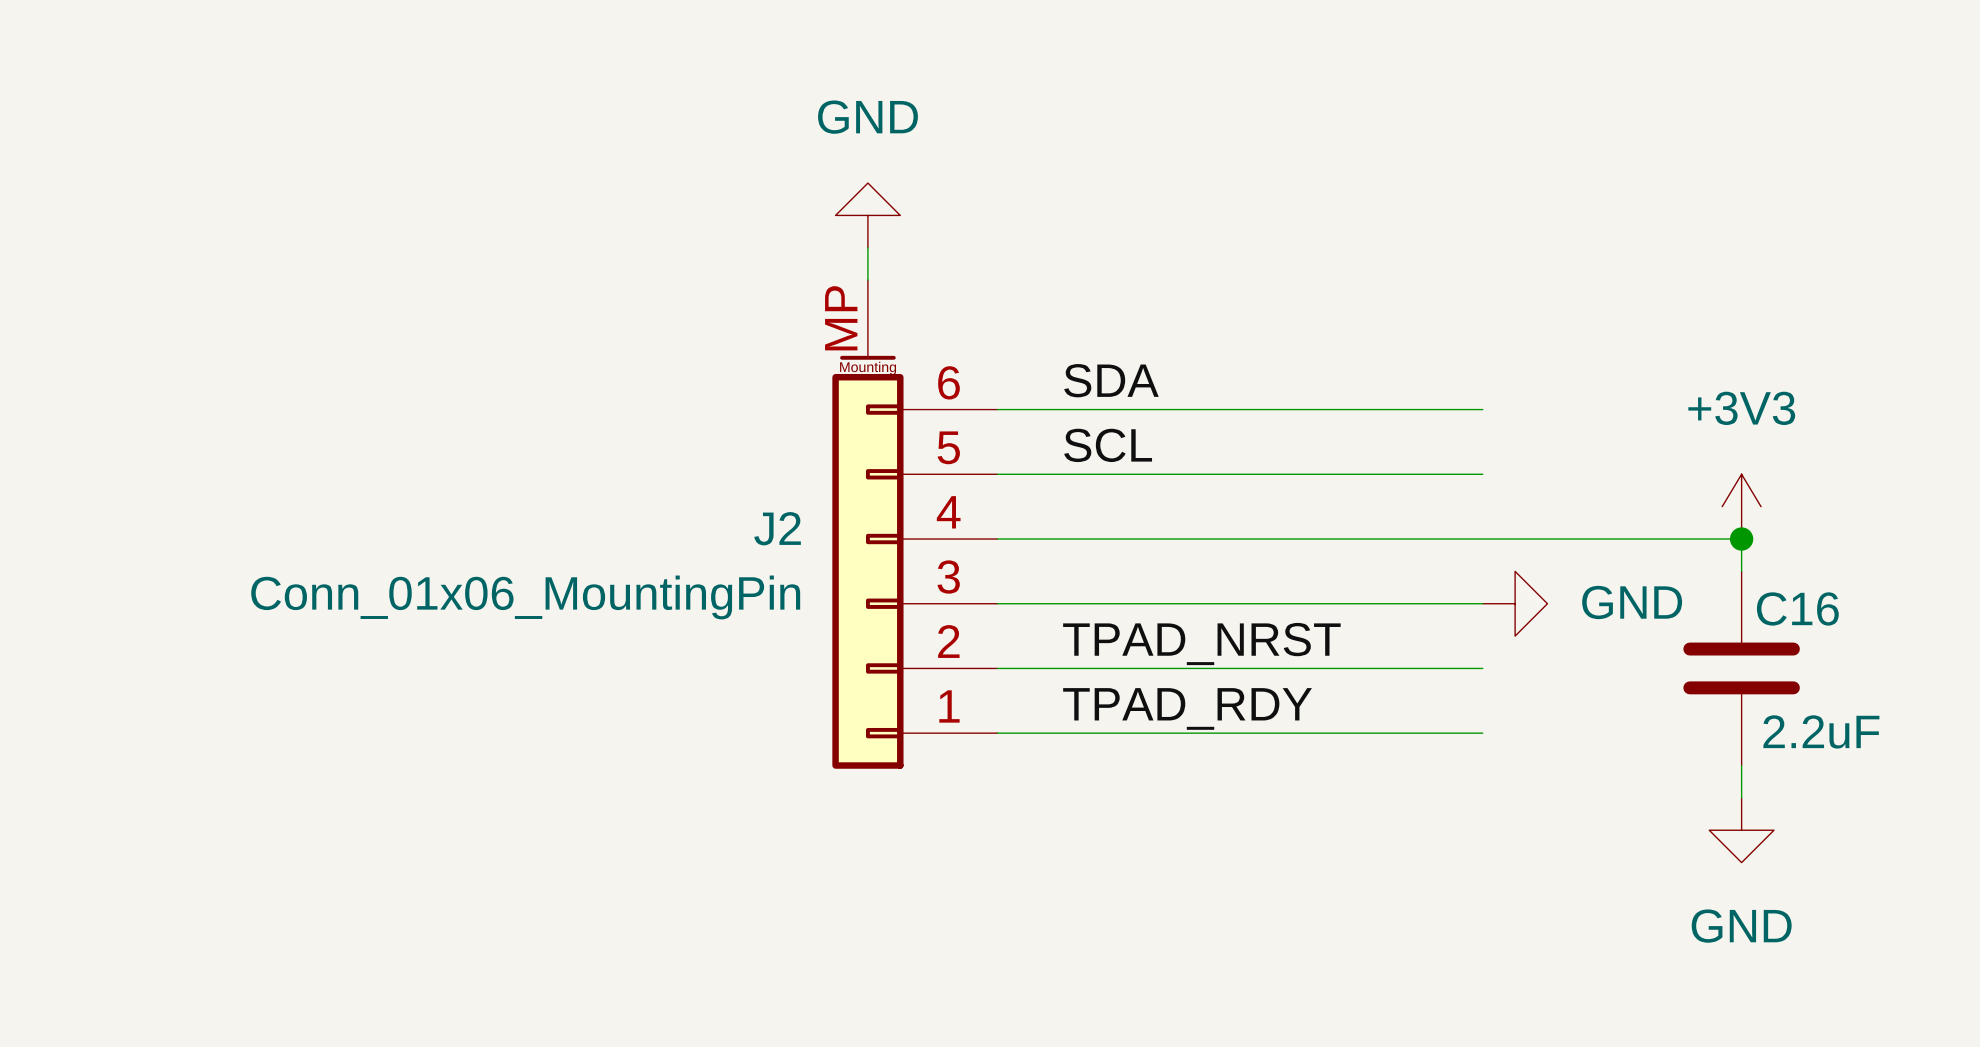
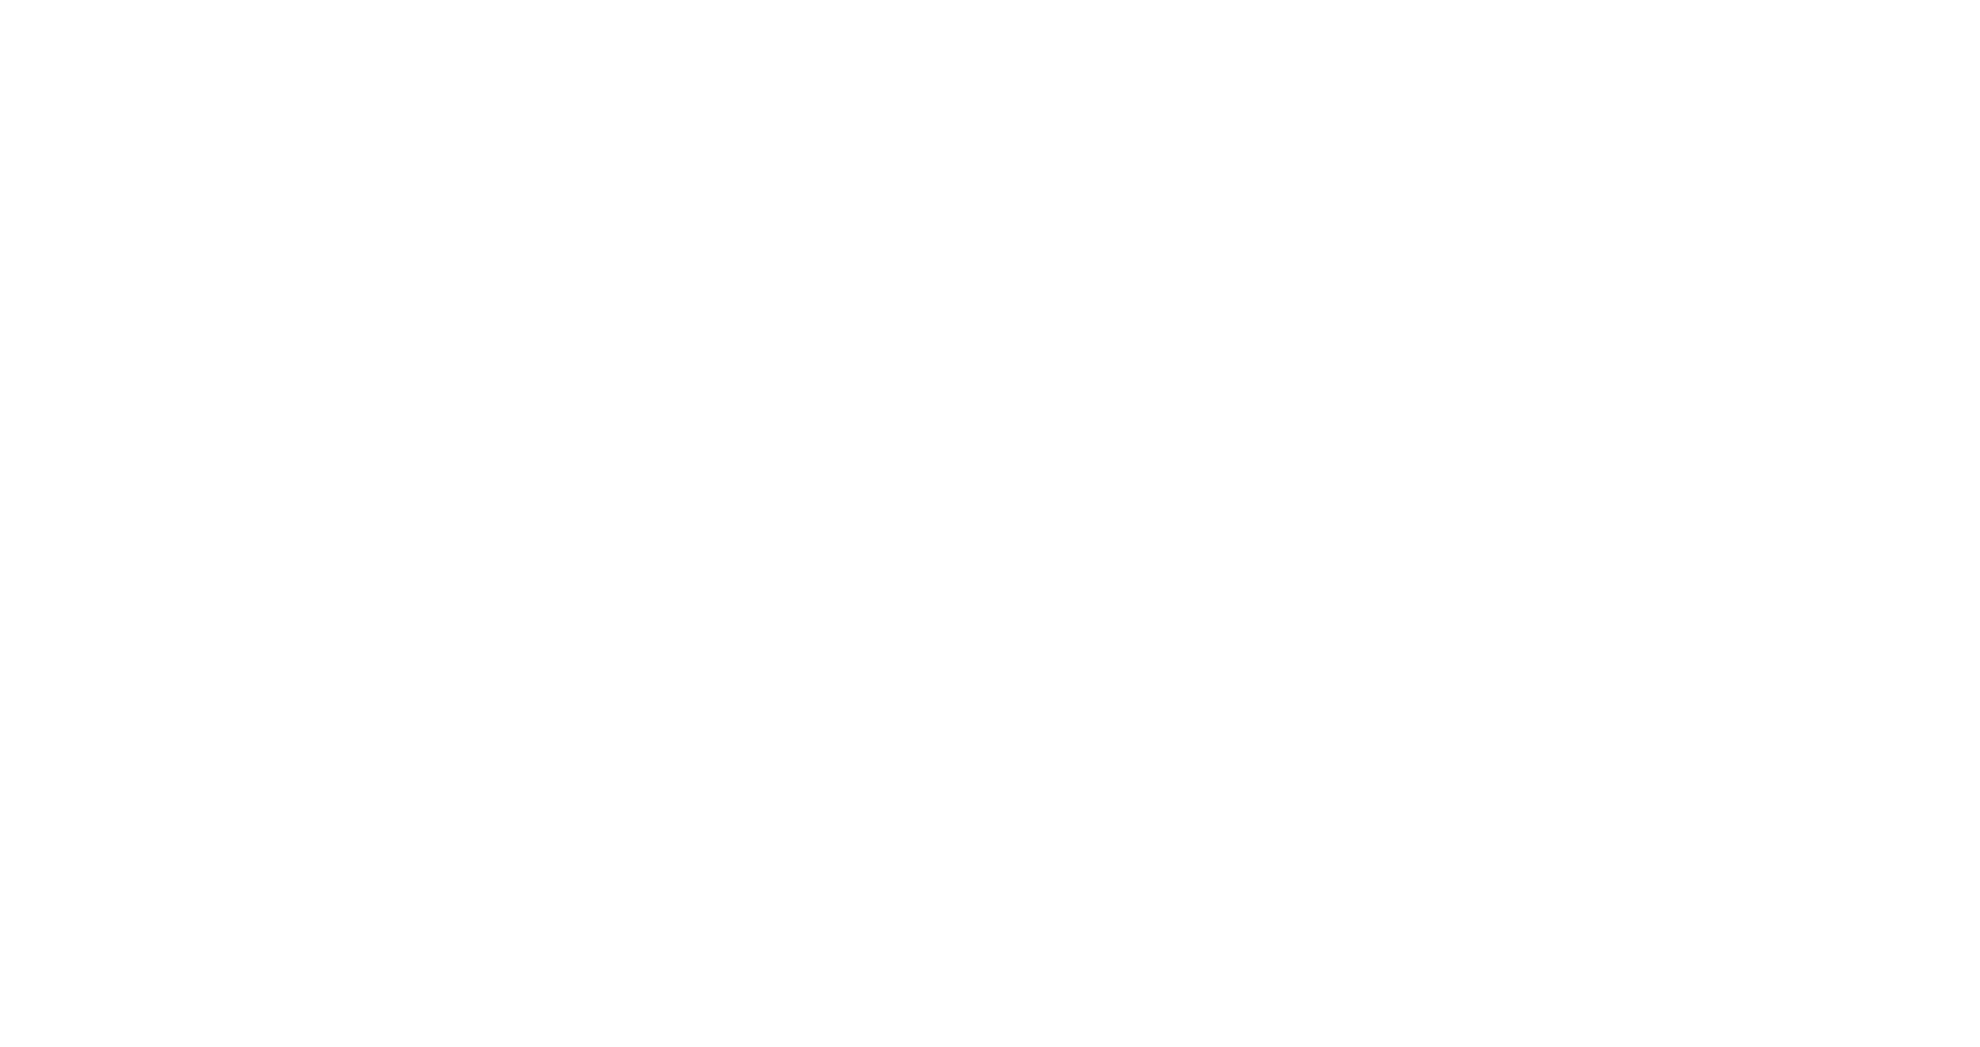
power symbol: GND (867, 215) -> none
wire: (867, 247) (867, 280) -> none
label: SDA (1111, 380) -> none
wire: (997, 409) (1482, 409) -> none
label: SCL (1108, 445) -> none
wire: (997, 474) (1482, 474) -> none
power symbol: +3V3 (1741, 506) -> none
J2: Conn_01x06_MountingPin (914, 524) -> none
wire: (997, 539) (1741, 539) (1741, 571) -> none
junction: (1741, 539) -> none
wire: (997, 603) (1482, 603) -> none
power symbol: GND (1515, 603) -> none
label: TPAD_NRST (1201, 644) -> none
wire: (997, 668) (1482, 668) -> none
C16: 2.2uF (1741, 668) -> none
label: TPAD_RDY (1187, 708) -> none
wire: (997, 733) (1482, 733) -> none
wire: (1741, 765) (1741, 797) -> none
power symbol: GND (1741, 830) -> none

